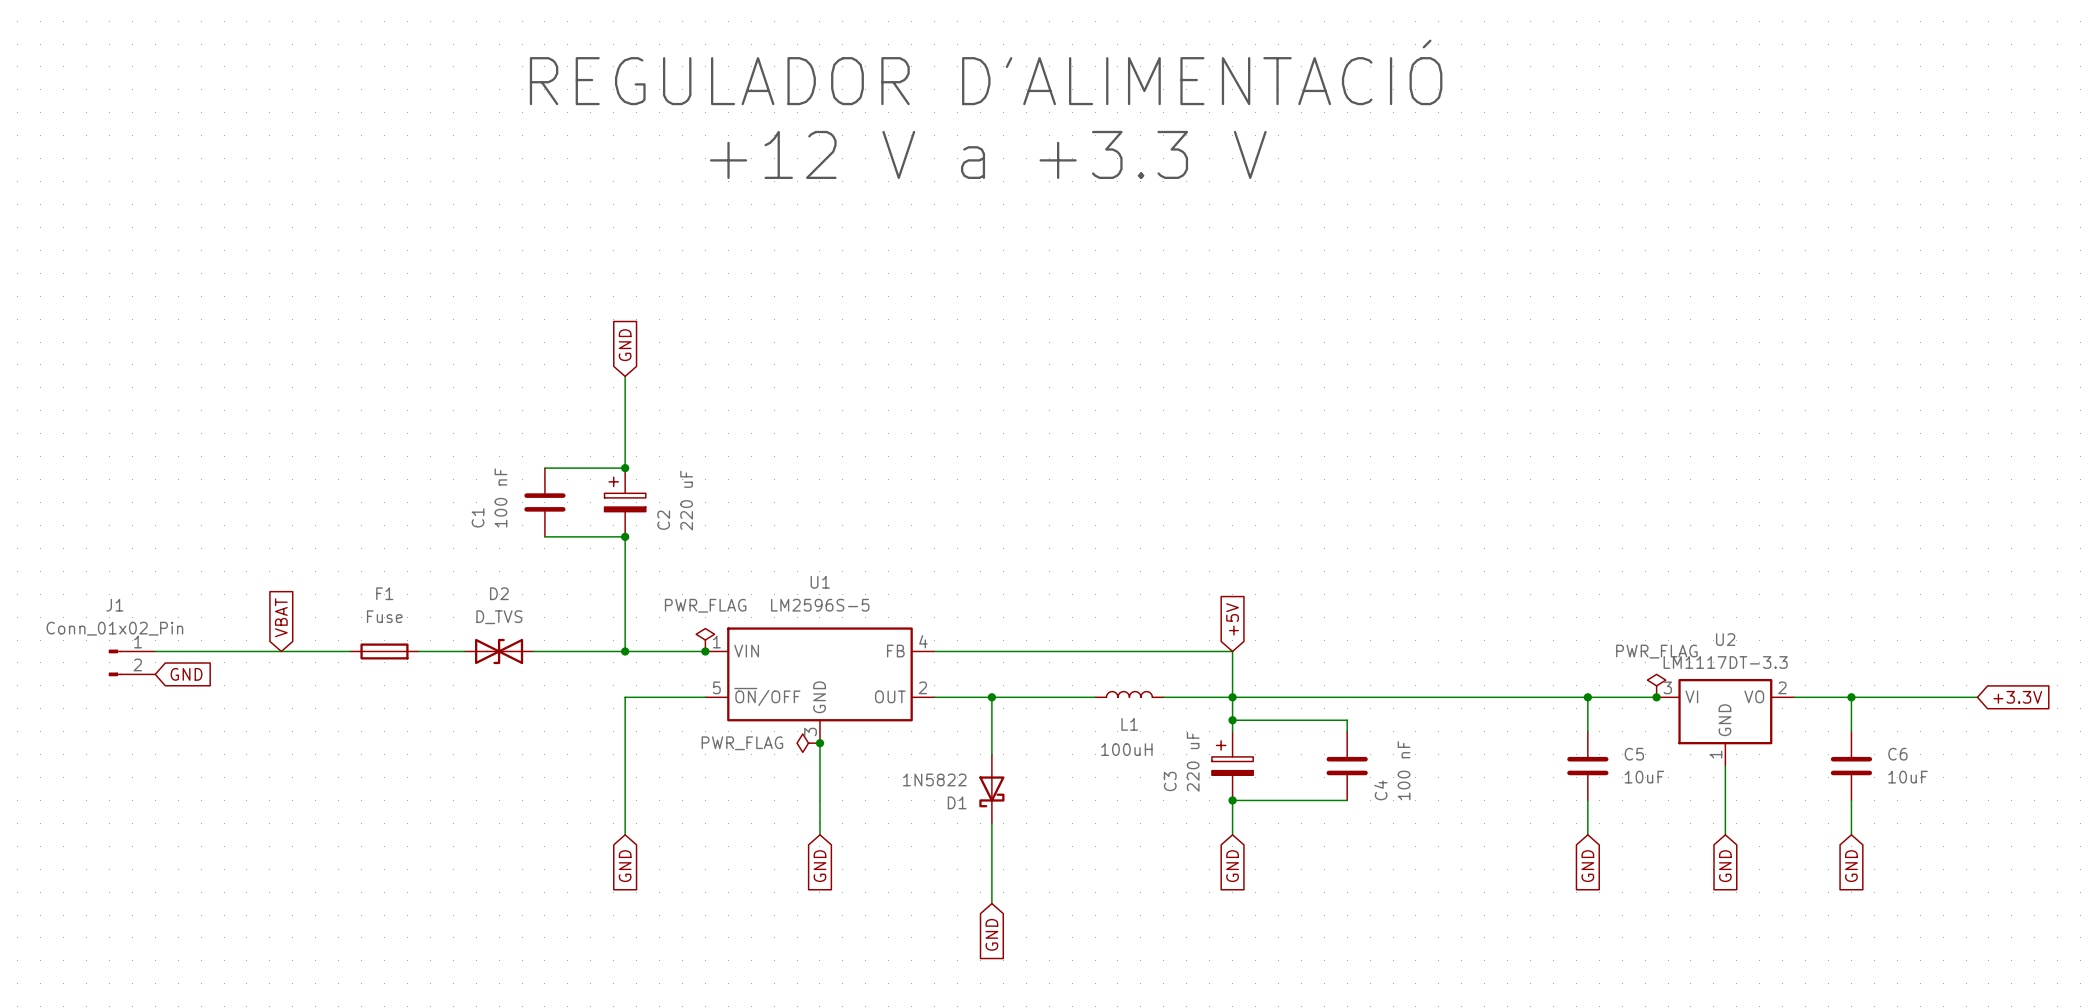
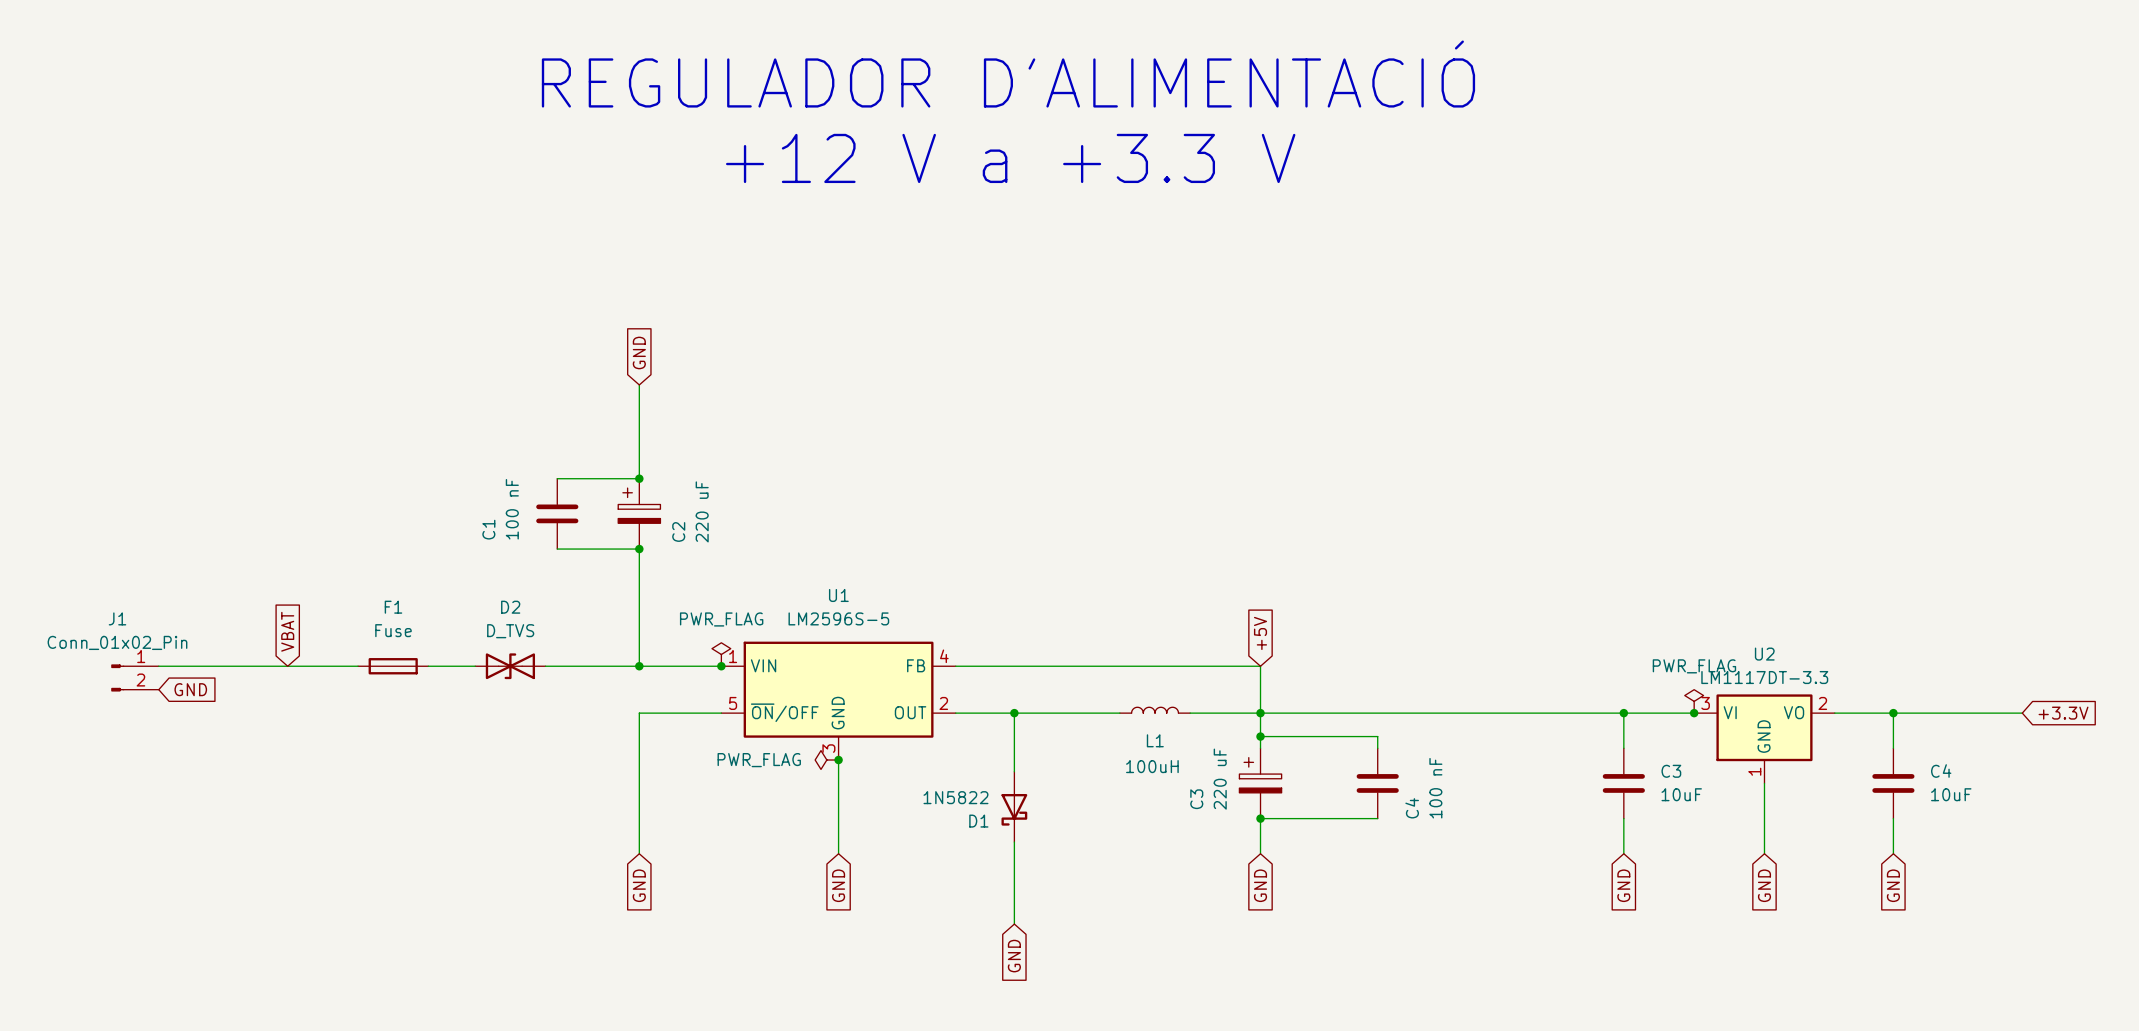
C5 name: C5 (1634, 754) -> C3 (1671, 771)
C6 name: C6 (1897, 754) -> C4 (1941, 771)

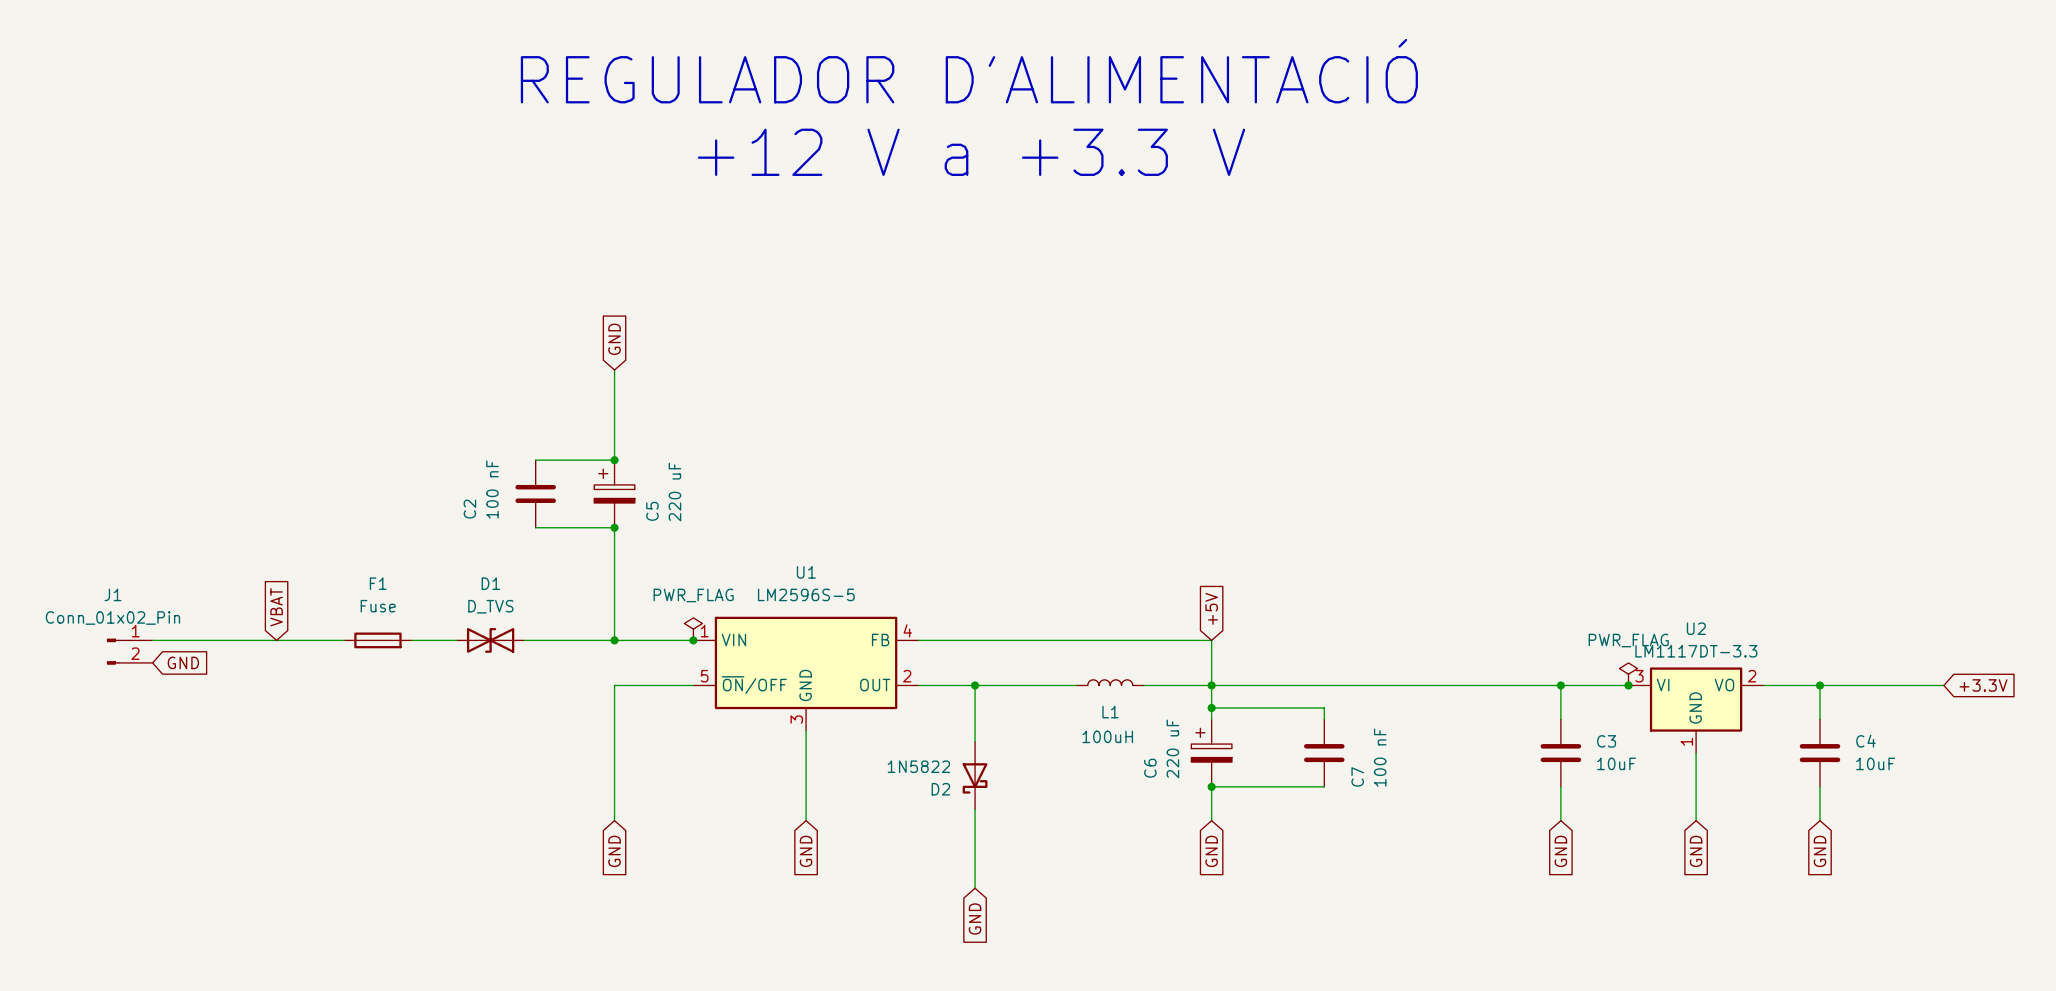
C1 name: C1 (488, 529) -> C2 (469, 509)
C2 name: C2 (678, 531) -> C5 (652, 511)
D2 name: D2 (510, 607) -> D1 (490, 583)
power symbol: PWR_FLAG (826, 760) -> none
junction: (838, 760) -> none
C3 name: C3 (1196, 799) -> C6 (1150, 768)
C4 name: C4 (1412, 808) -> C7 (1357, 776)
D1 name: D1 (978, 821) -> D2 (940, 789)

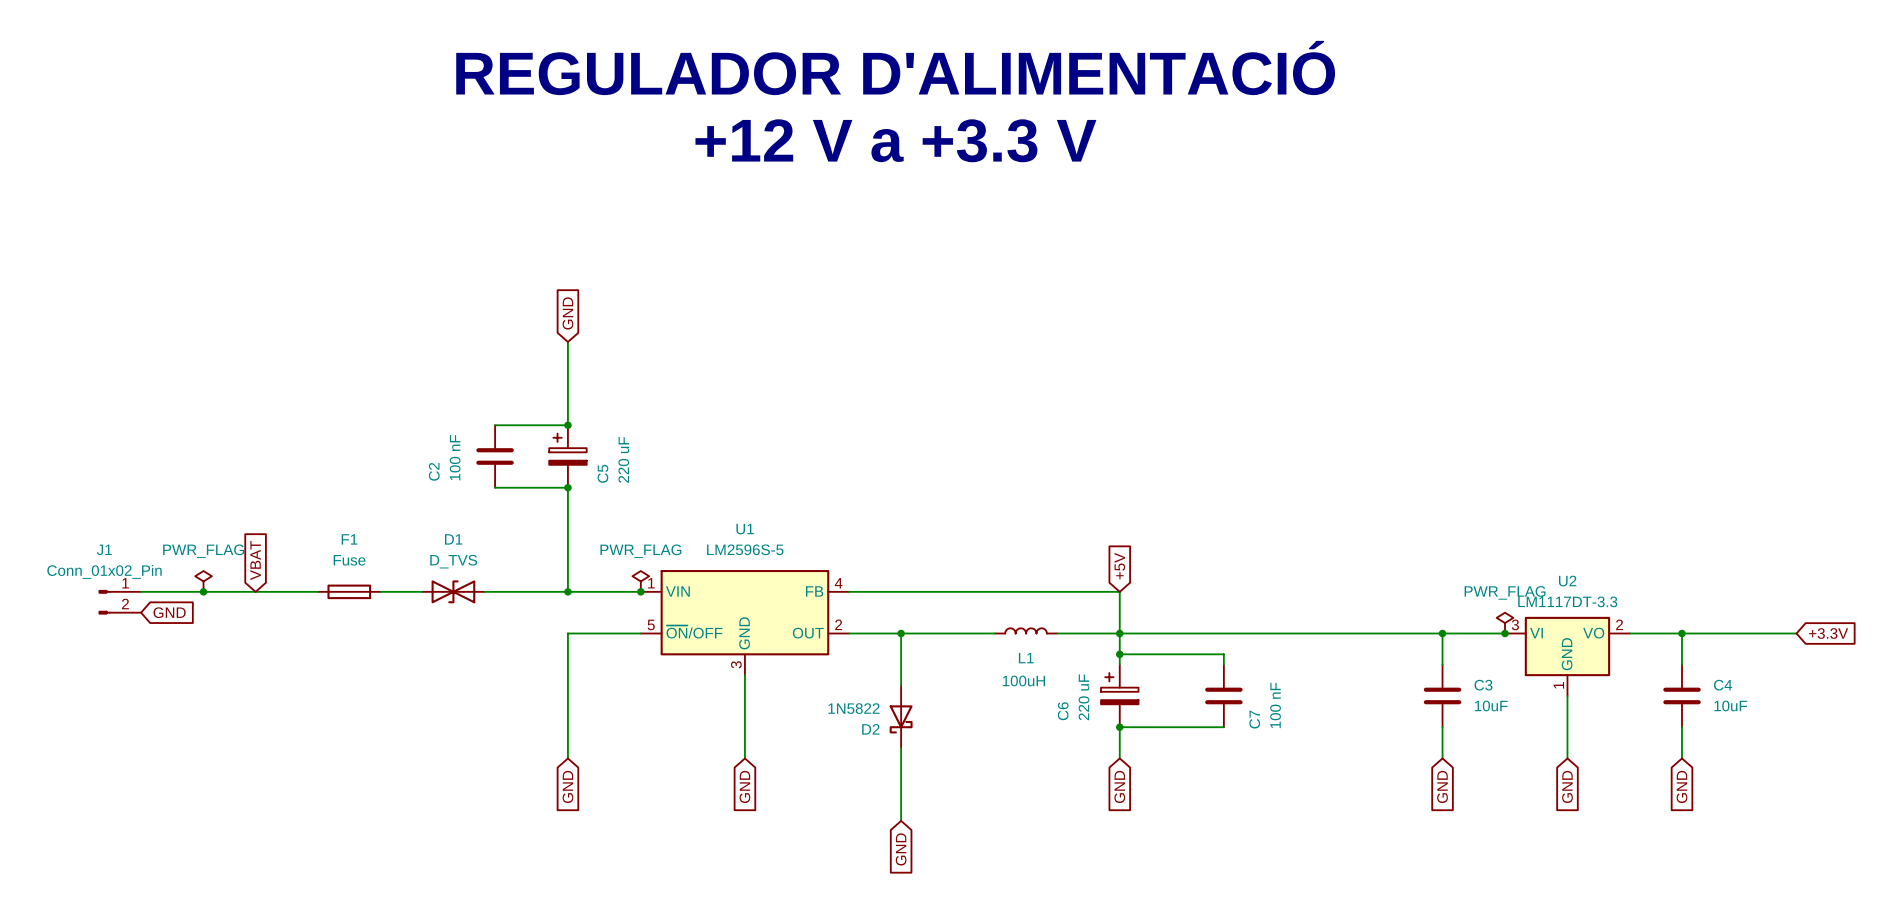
power symbol: none -> PWR_FLAG (203, 581)
junction: none -> (203, 591)

